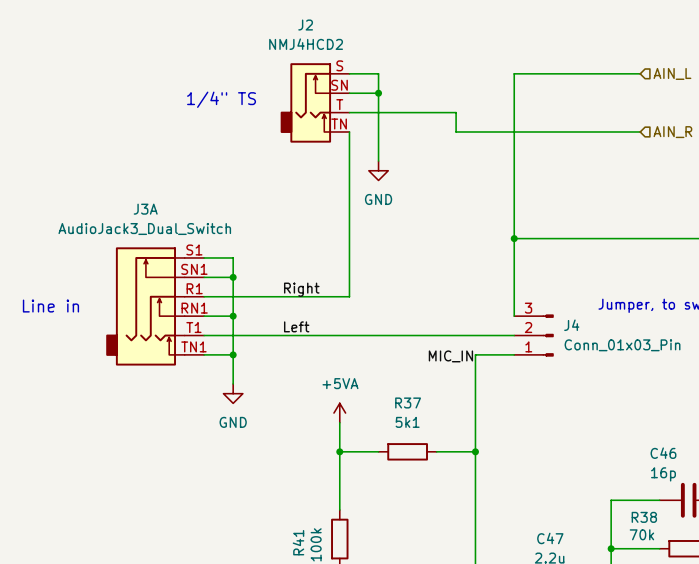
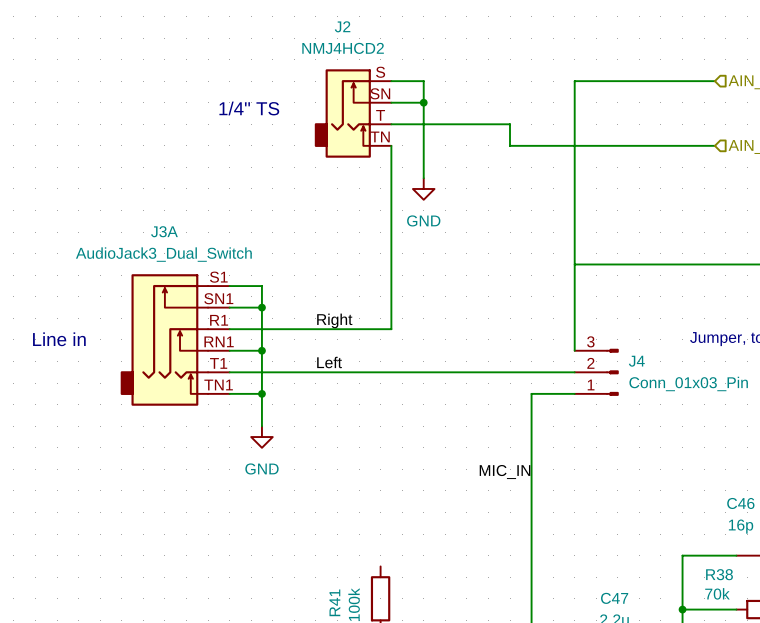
junction: (514, 238) -> none
label position: MIC_IN (450, 356) -> MIC_IN (505, 472)
power symbol: +5VA (339, 413) -> none
wire: (339, 422) (339, 509) -> none
wire: (339, 451) (378, 451) -> none
junction: (339, 451) -> none
R37: 5k1 (407, 451) -> none
wire: (436, 451) (475, 451) -> none
junction: (475, 451) -> none

